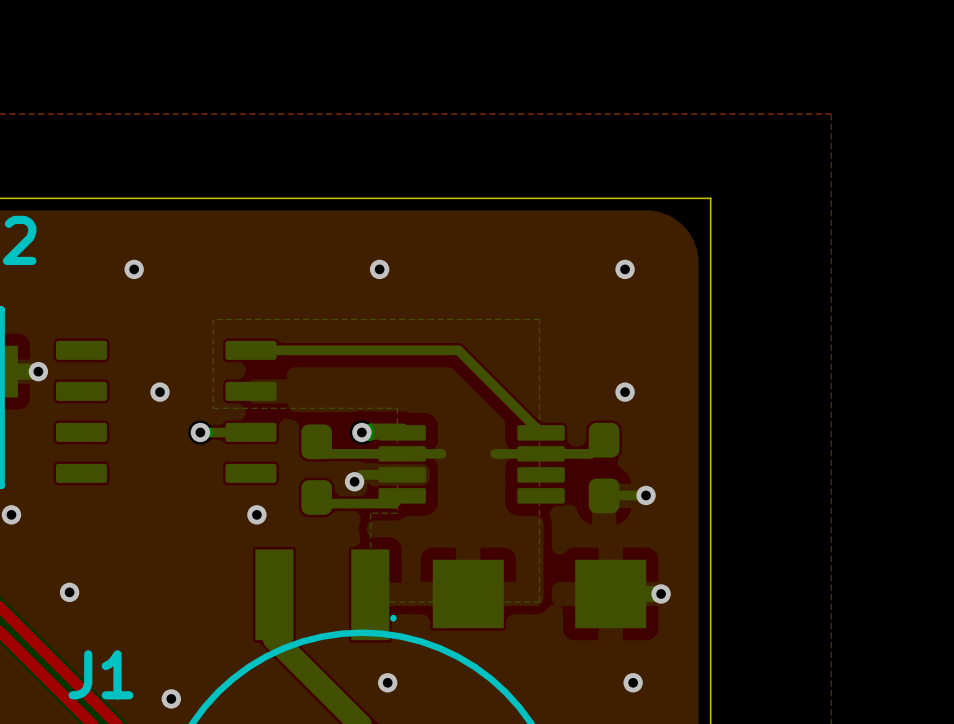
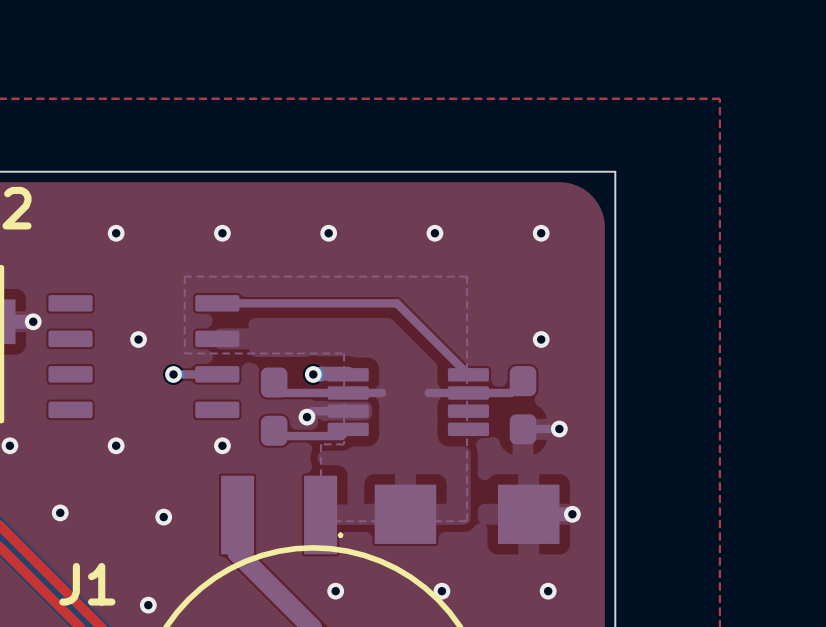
via: none -> (222, 233)
via: none -> (434, 233)
via: none -> (116, 445)
via: none -> (163, 517)
via: none -> (441, 591)

